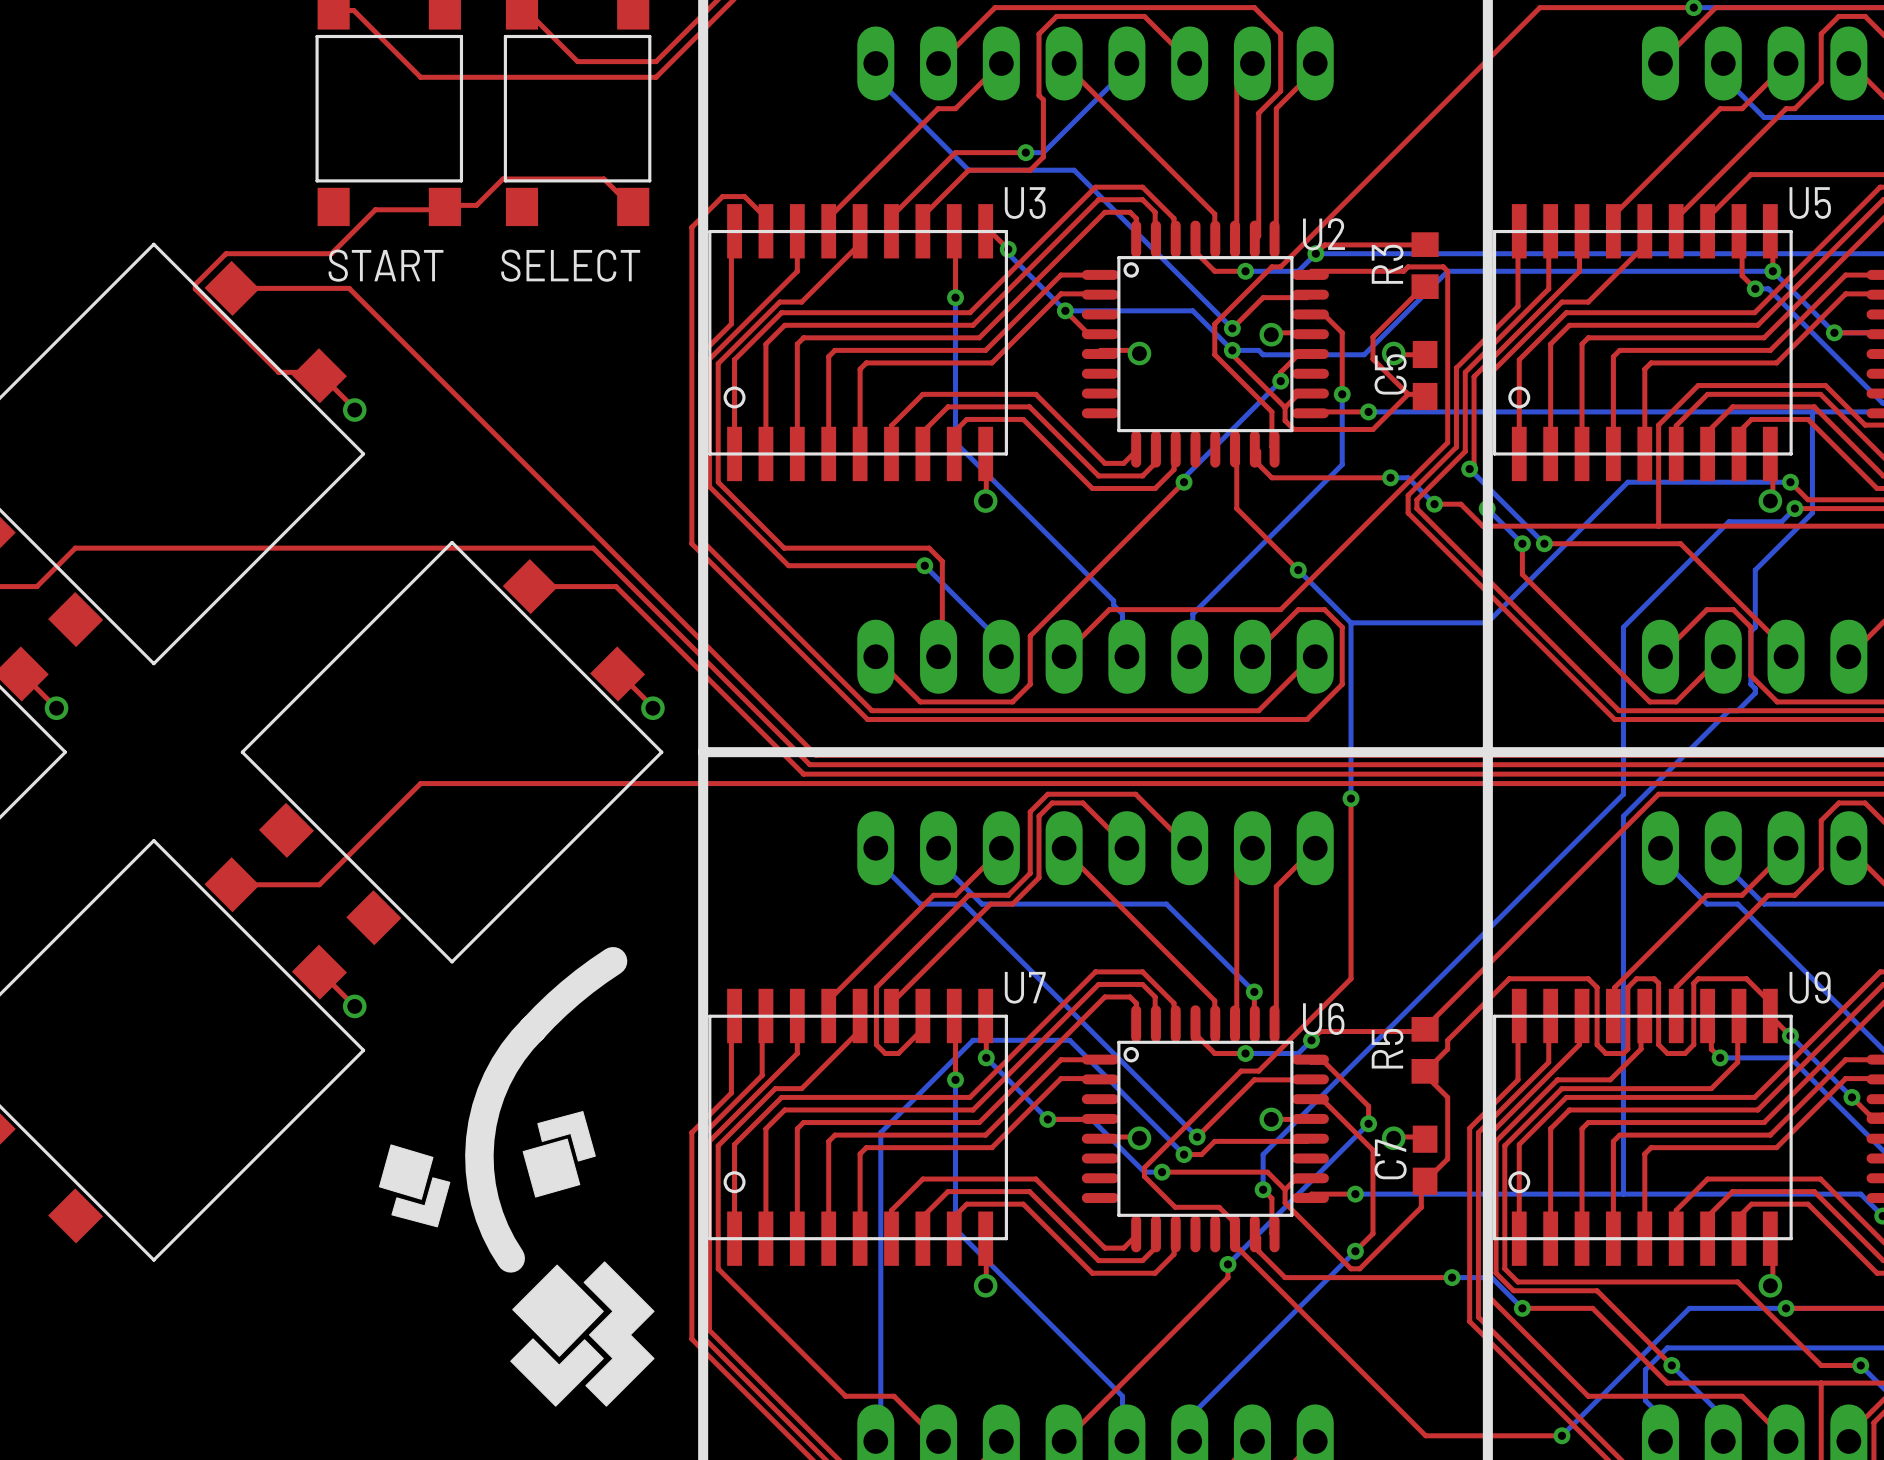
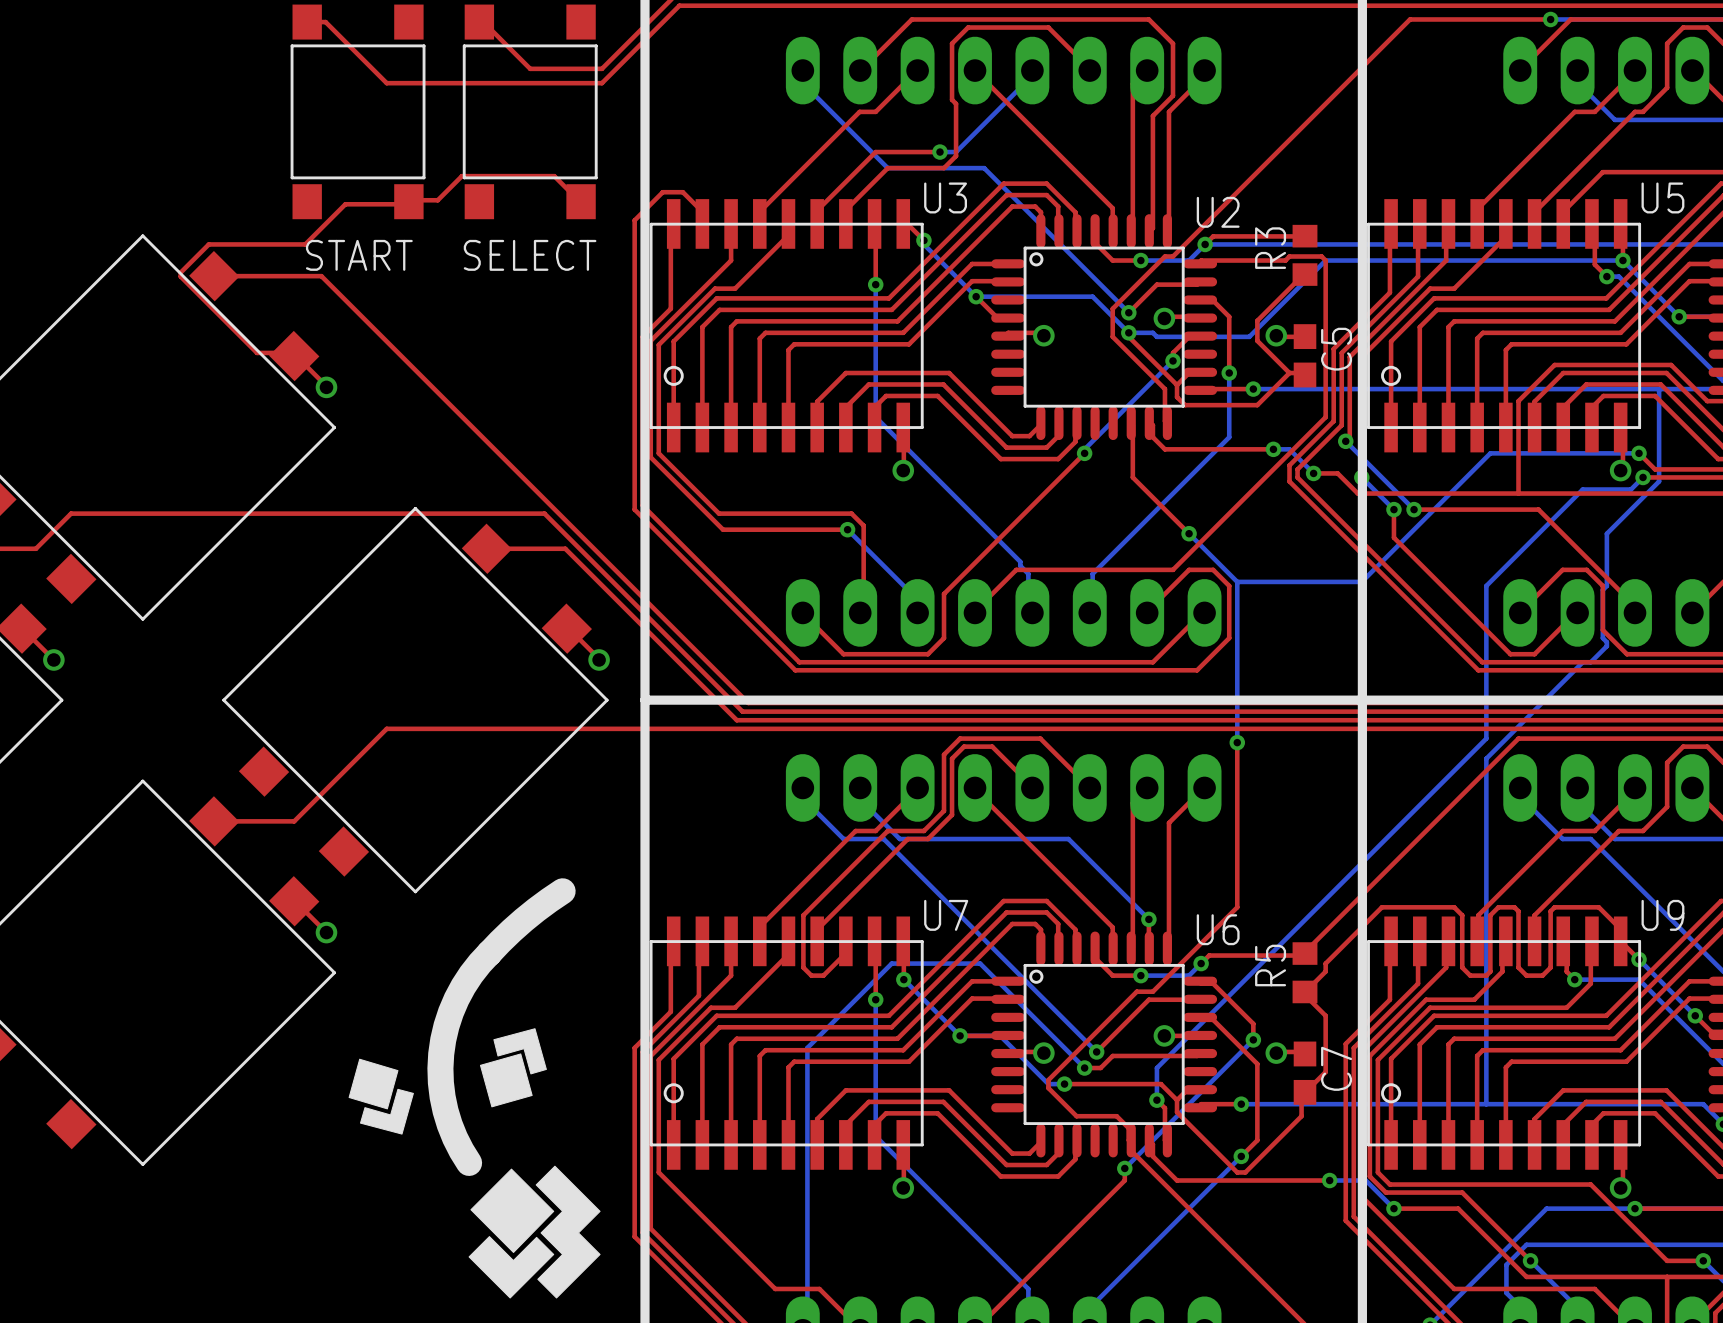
U2 name position: U2 (1323, 234) -> U2 (1218, 212)
C5 name position: C5 (1390, 374) -> C5 (1336, 349)
U6 name position: U6 (1323, 1018) -> U6 (1218, 929)
C7 name position: C7 (1390, 1159) -> C7 (1336, 1068)

